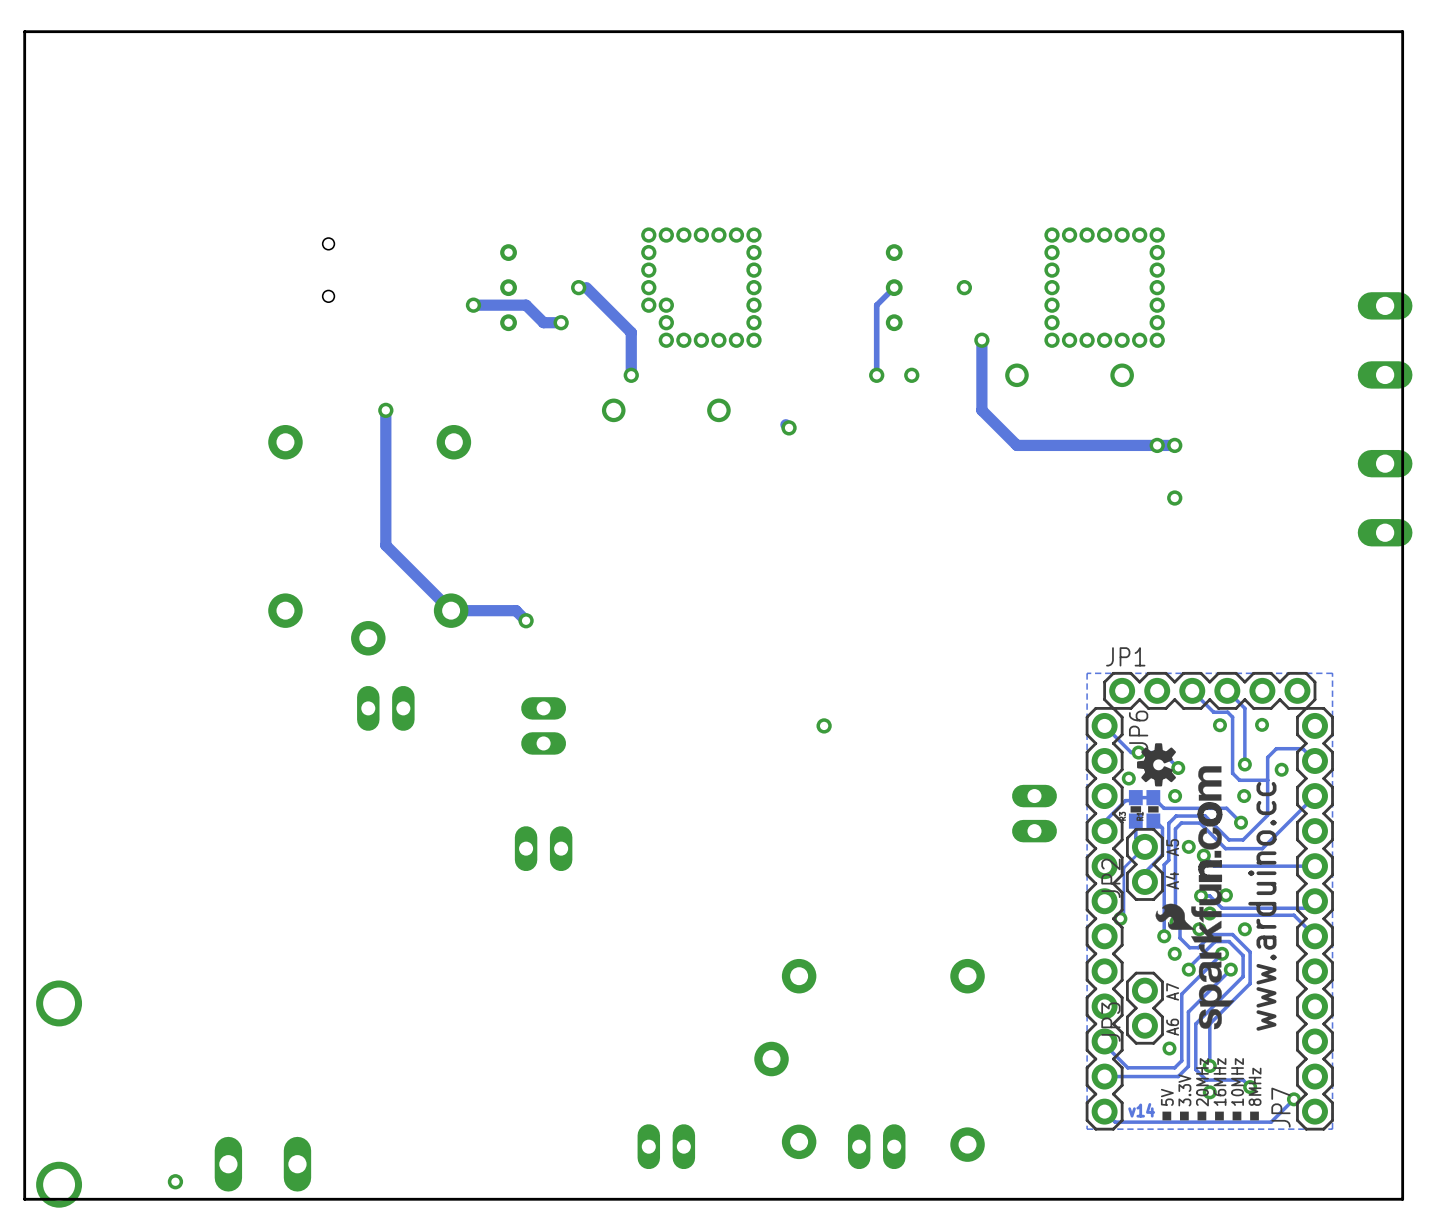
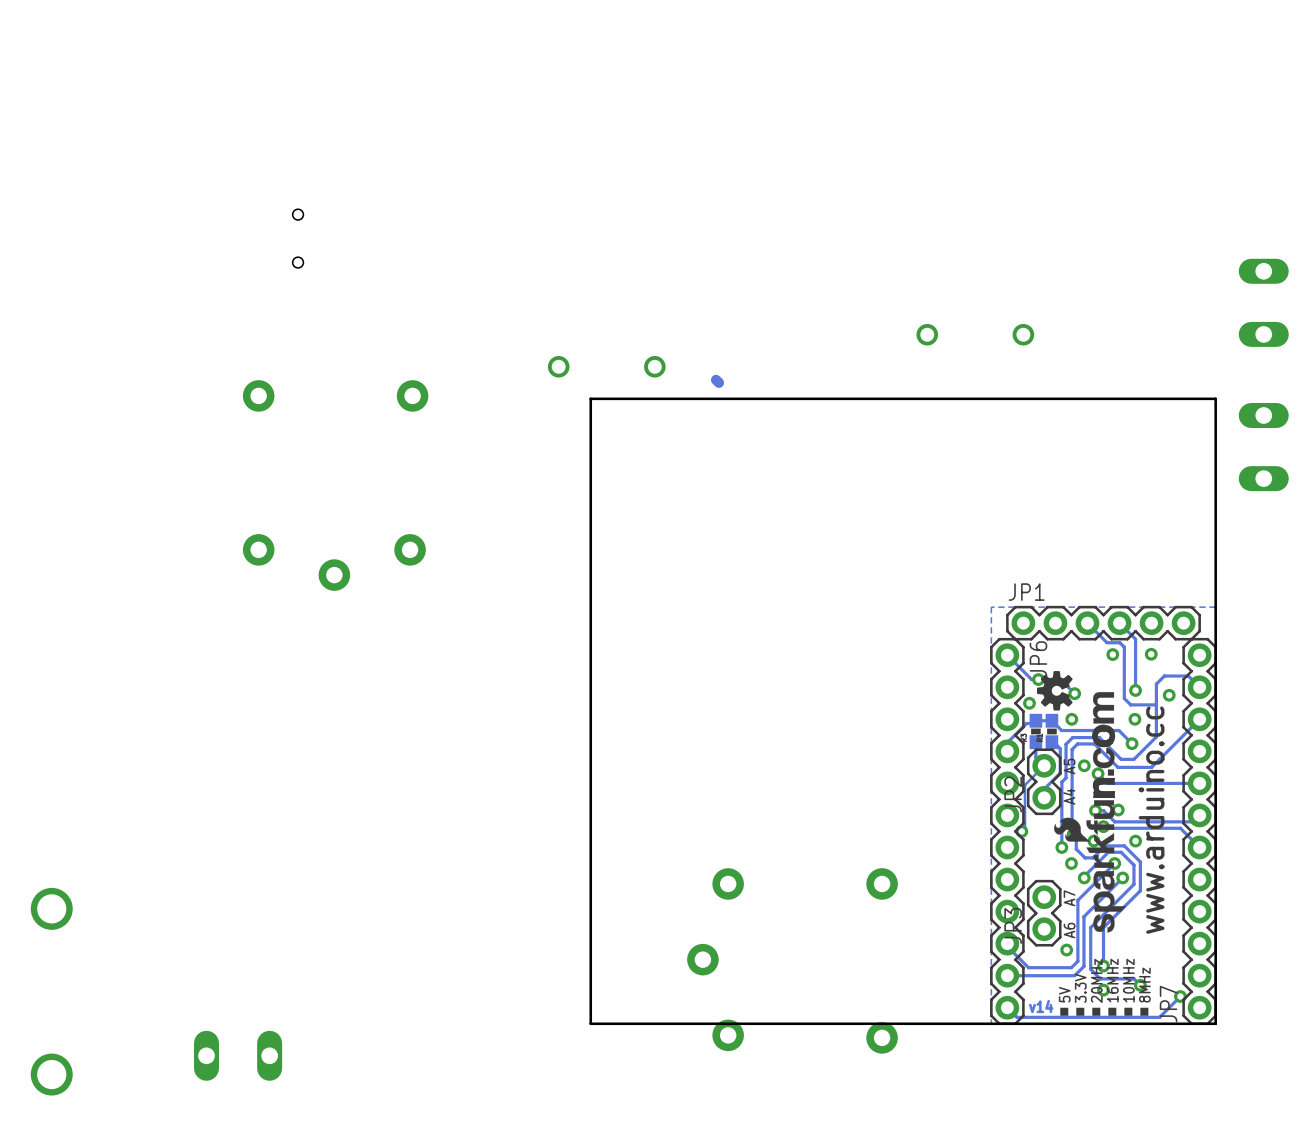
board edge: (1402, 31) (1402, 1199) (24, 1199) (24, 31) (1402, 31) -> none
via: (648, 235) -> none
via: (666, 235) -> none
via: (683, 235) -> none
via: (701, 235) -> none
via: (718, 235) -> none
via: (736, 235) -> none
via: (753, 235) -> none
via: (1052, 235) -> none
via: (1069, 235) -> none
via: (1087, 235) -> none
via: (1104, 235) -> none
via: (1122, 235) -> none
via: (1139, 235) -> none
via: (1157, 235) -> none
via: (648, 252) -> none
via: (753, 252) -> none
via: (1052, 252) -> none
via: (1157, 252) -> none
via: (648, 270) -> none
via: (753, 270) -> none
via: (1052, 270) -> none
via: (1157, 270) -> none
part: (508, 287) -> none
via: (578, 287) -> none
track: (586, 287) (631, 332) (631, 375) -> none
via: (648, 287) -> none
via: (753, 287) -> none
track: (894, 287) (876, 305) (876, 375) -> none
part: (894, 287) -> none
via: (964, 287) -> none
via: (1052, 287) -> none
via: (1157, 287) -> none
track: (473, 305) (526, 305) (543, 322) (561, 322) -> none
via: (473, 305) -> none
via: (648, 305) -> none
via: (666, 305) -> none
via: (753, 305) -> none
via: (1052, 305) -> none
via: (1157, 305) -> none
via: (561, 322) -> none
via: (666, 322) -> none
via: (753, 322) -> none
via: (1052, 322) -> none
via: (1157, 322) -> none
via: (666, 340) -> none
via: (683, 340) -> none
via: (701, 340) -> none
via: (718, 340) -> none
via: (736, 340) -> none
via: (753, 340) -> none
track: (981, 340) (981, 410) (1016, 445) (1174, 445) -> none
via: (981, 340) -> none
via: (1052, 340) -> none
via: (1069, 340) -> none
via: (1087, 340) -> none
via: (1104, 340) -> none
via: (1122, 340) -> none
via: (1139, 340) -> none
via: (1157, 340) -> none
via: (631, 375) -> none
via: (876, 375) -> none
via: (911, 375) -> none
track: (385, 410) (385, 545) (451, 610) (516, 610) (526, 620) -> none
via: (385, 410) -> none
via: (789, 427) -> none
via: (1157, 445) -> none
via: (1174, 445) -> none
board edge: none -> (1215, 398) (1215, 1023) (590, 1023) (590, 398) (1215, 398)
via: (1174, 498) -> none
via: (526, 620) -> none
part: (385, 708) -> none
part: (543, 725) -> none
via: (824, 725) -> none
part: (1034, 813) -> none
part: (543, 848) -> none
part: (666, 1146) -> none
part: (876, 1146) -> none
via: (175, 1181) -> none

